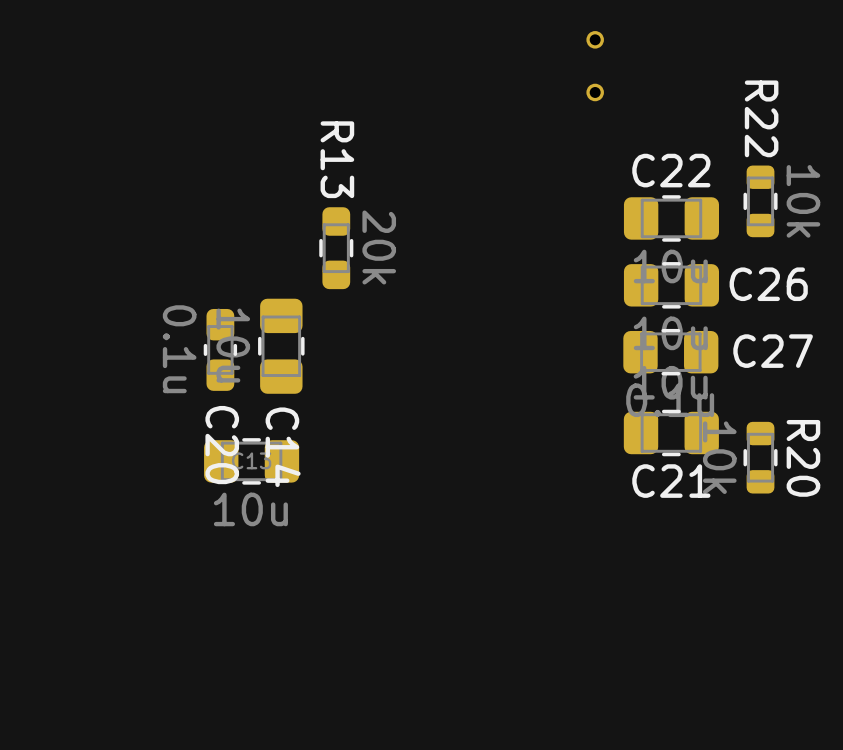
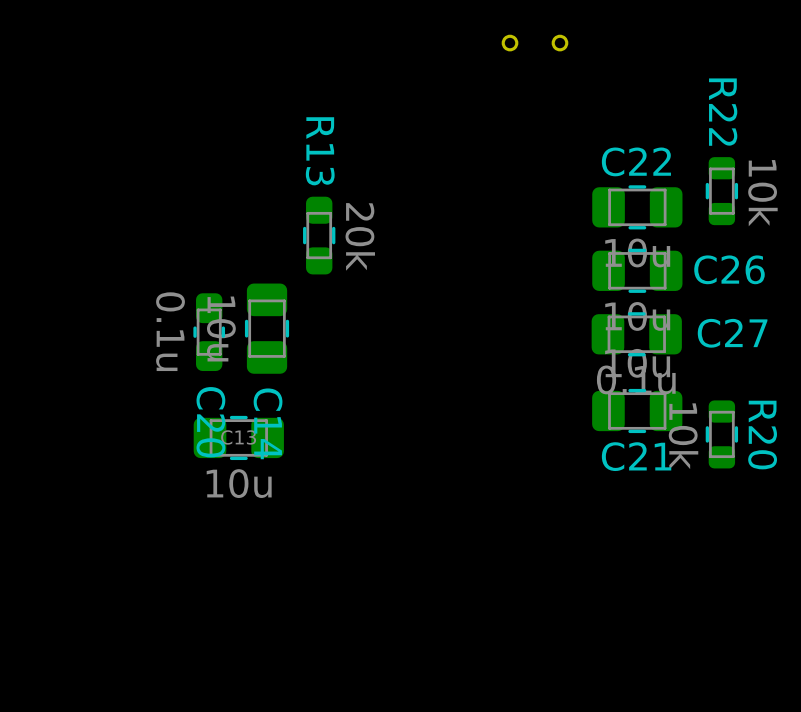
part rotation: 0° (595, 66) -> 90° clockwise (535, 43)

